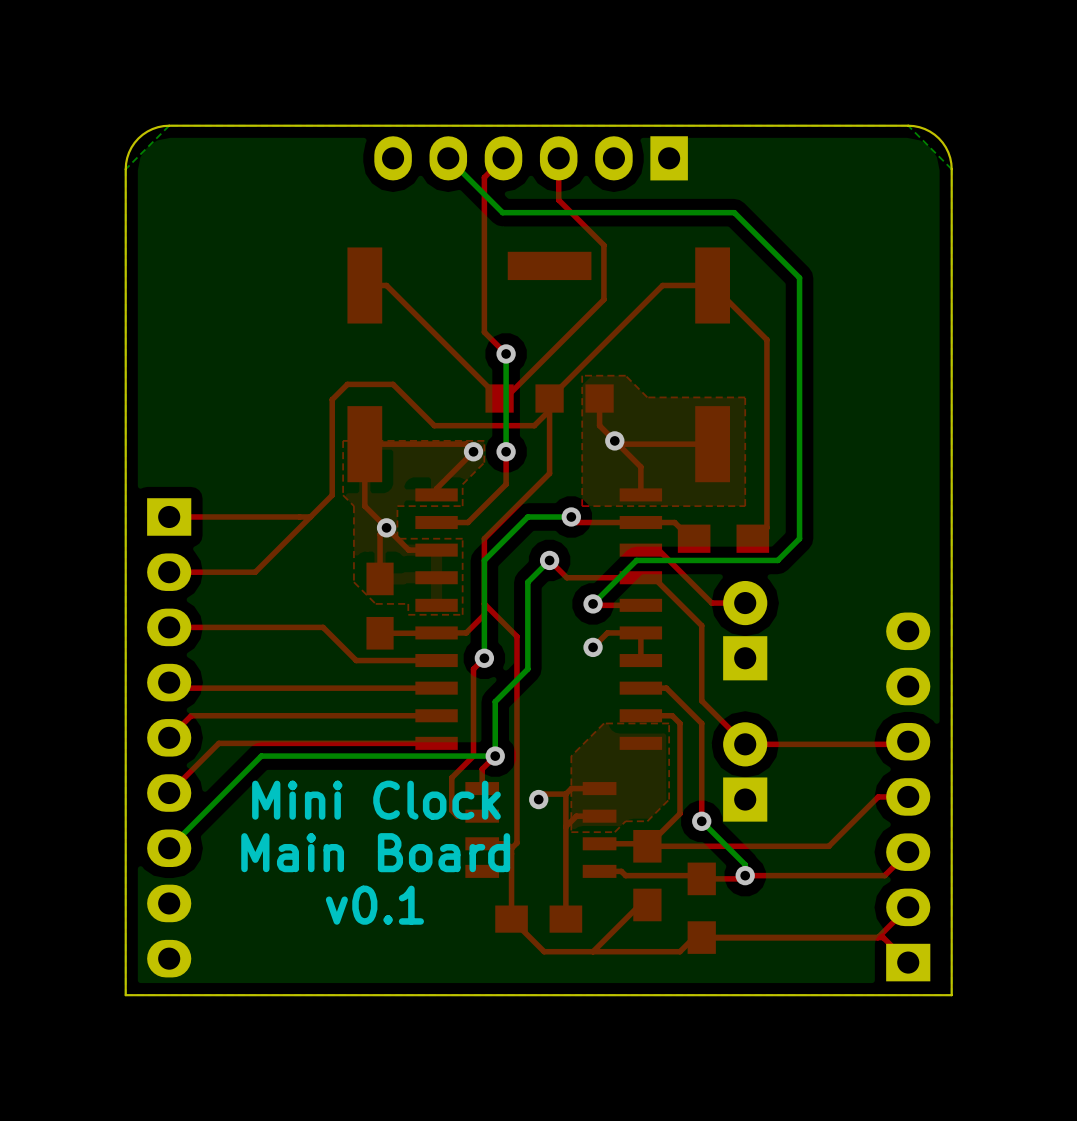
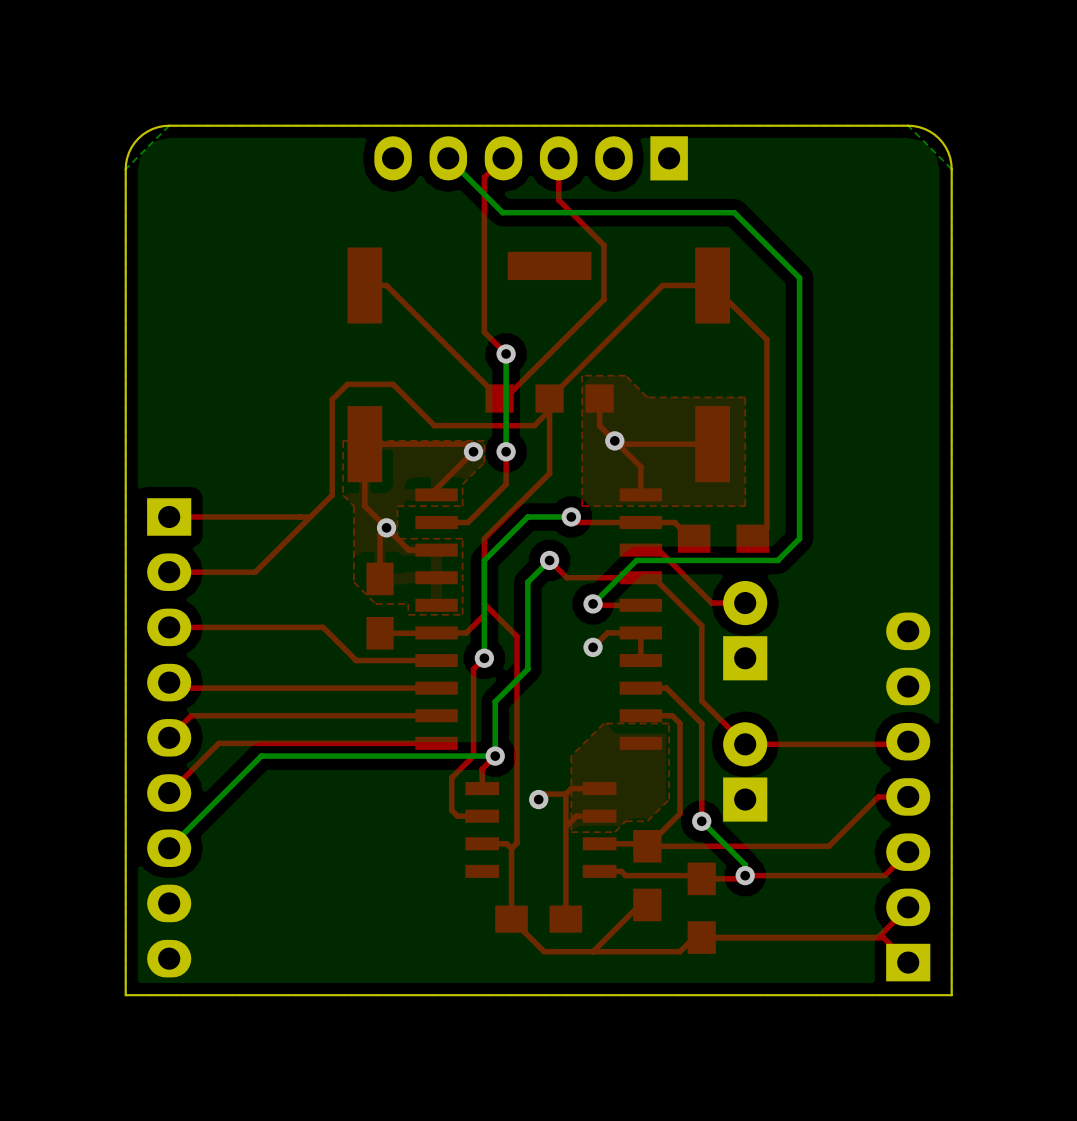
text: Mini Clock (376, 800) -> none
text: Main Board (375, 852) -> none
text: v0.1 (374, 905) -> none

